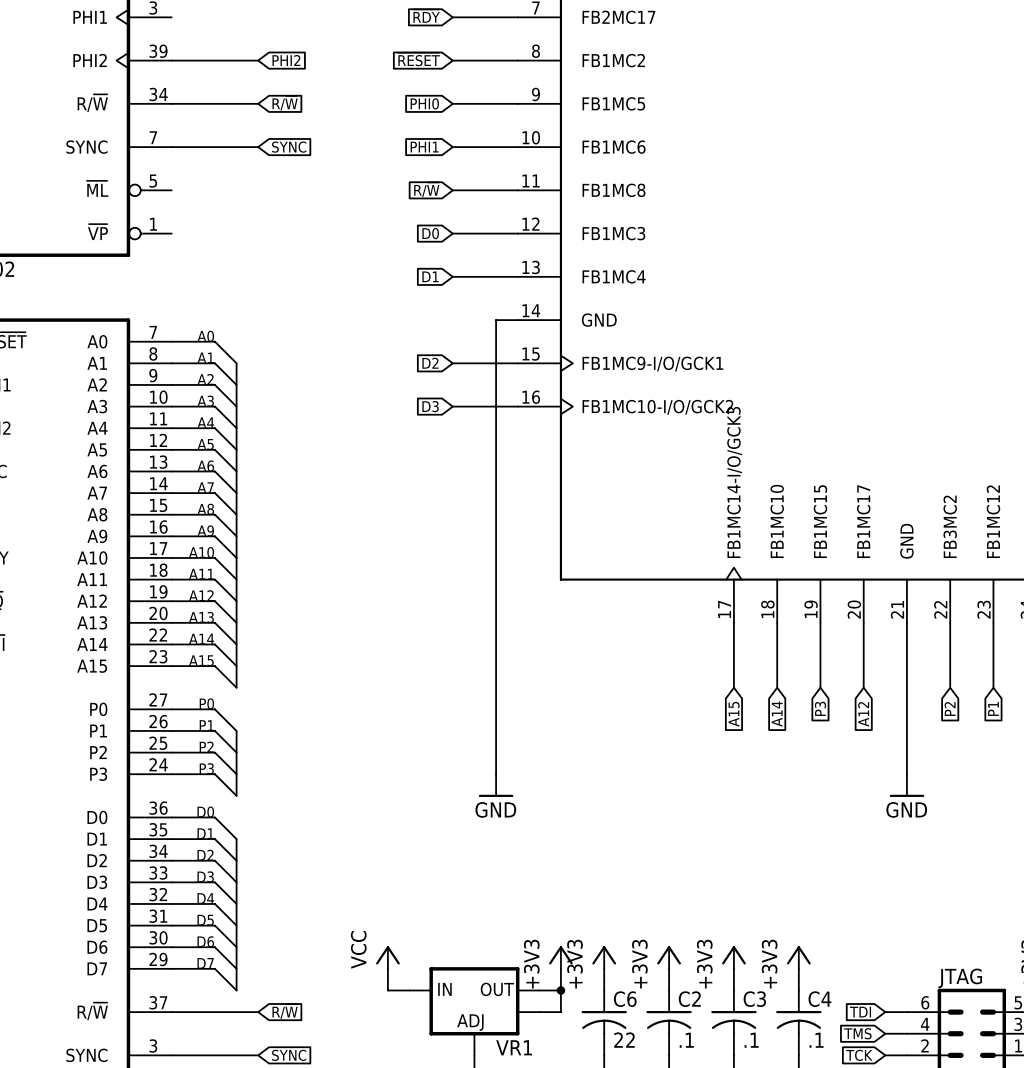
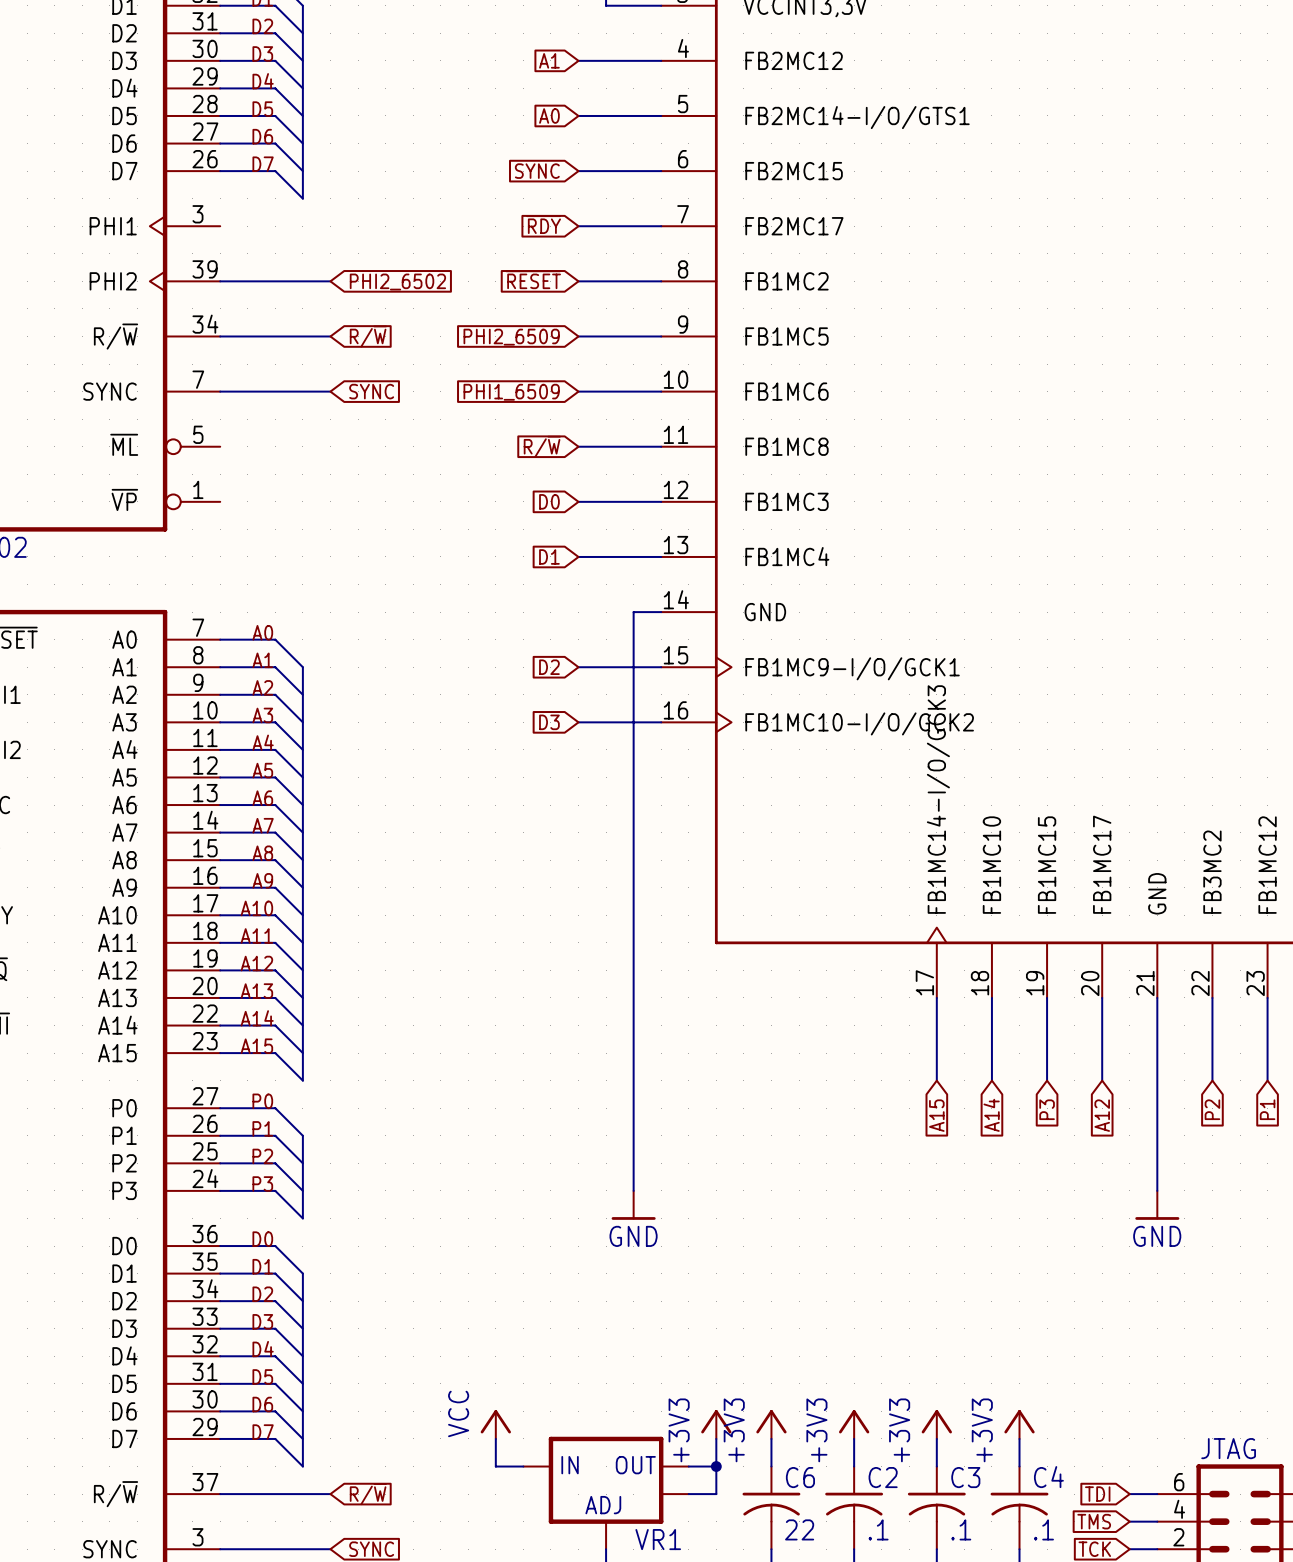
global label: PHI2 (286, 60) -> PHI2_6502 (397, 282)
global label: PHI0 (424, 103) -> PHI2_6509 (511, 337)
global label: PHI1 (424, 147) -> PHI1_6509 (511, 392)

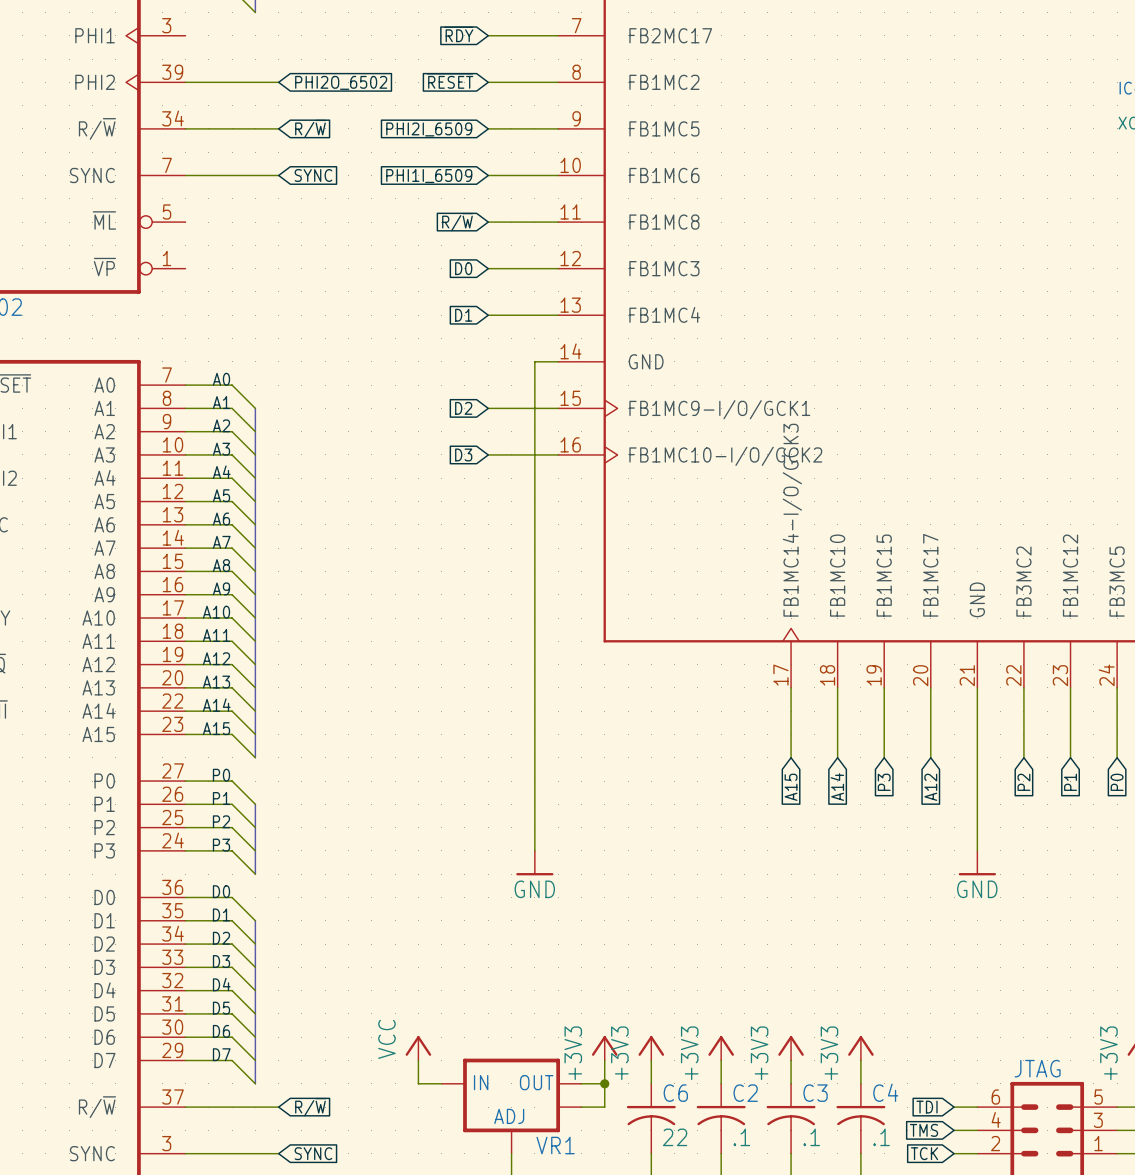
global label: PHI2_6502 (397, 282) -> PHI2O_6502 (341, 82)
global label: PHI2_6509 (511, 337) -> PHI2I_6509 (429, 129)
global label: PHI1_6509 (511, 392) -> PHI1I_6509 (429, 176)

